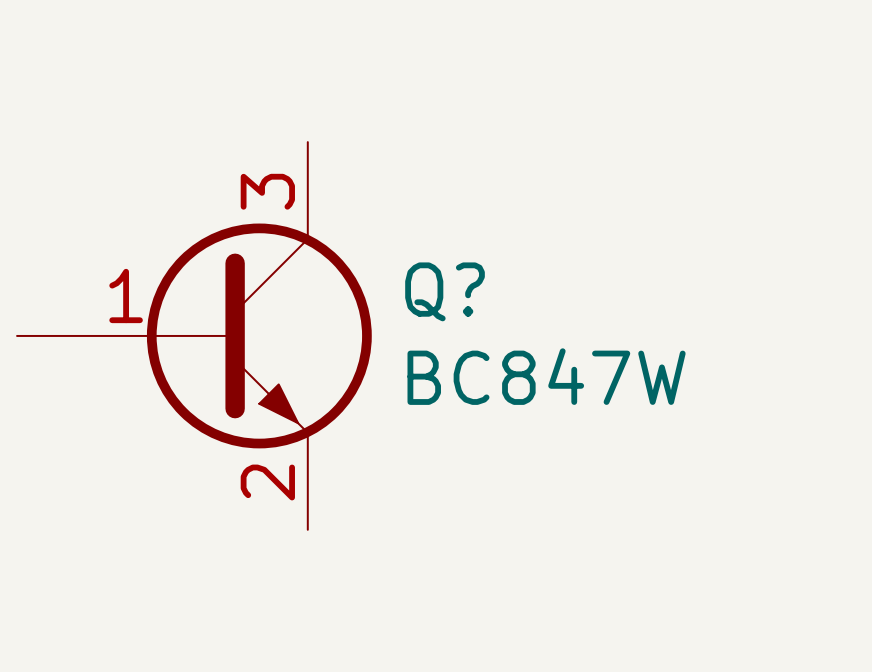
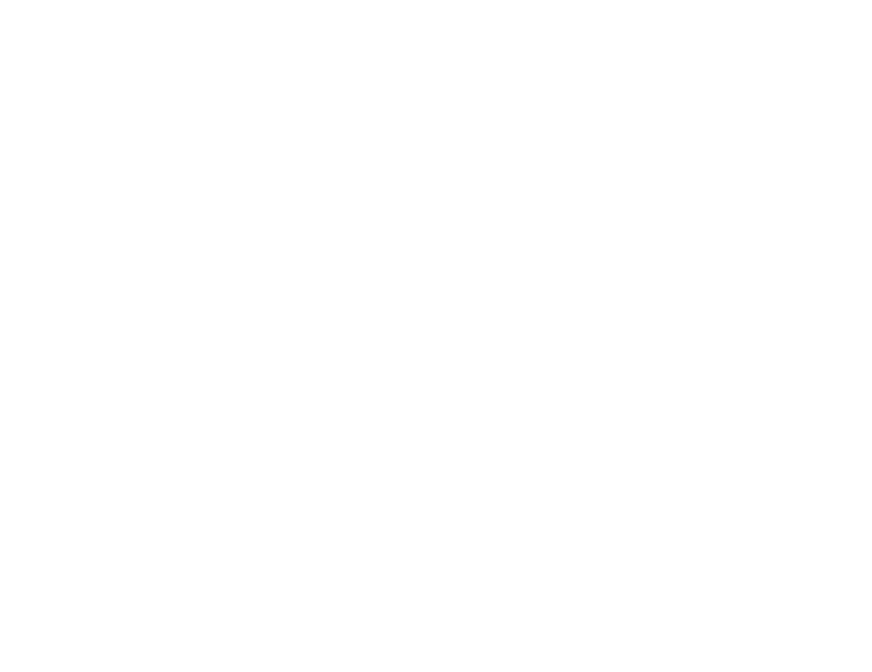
Q?: BC847W (194, 335) -> none

